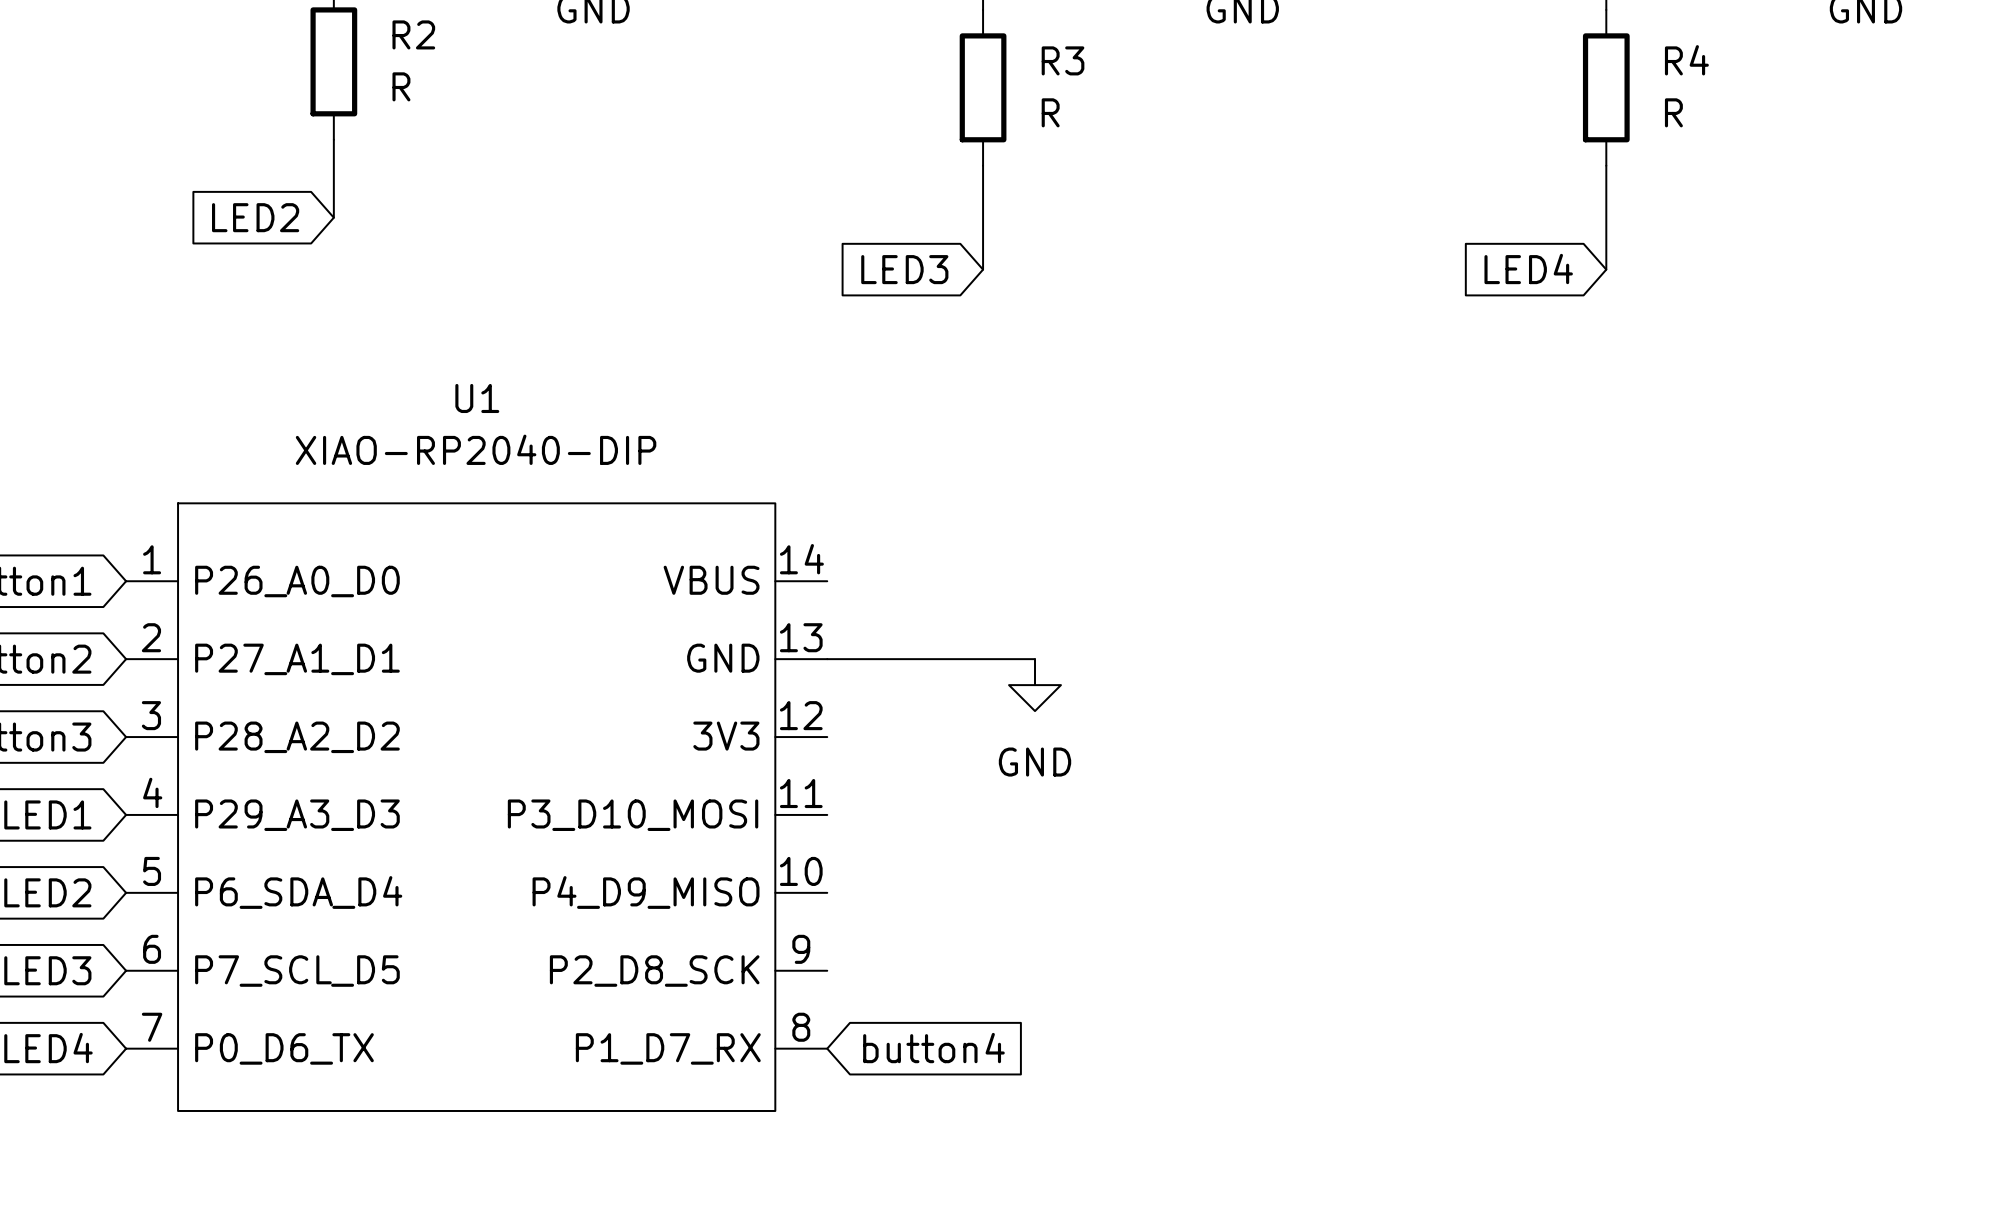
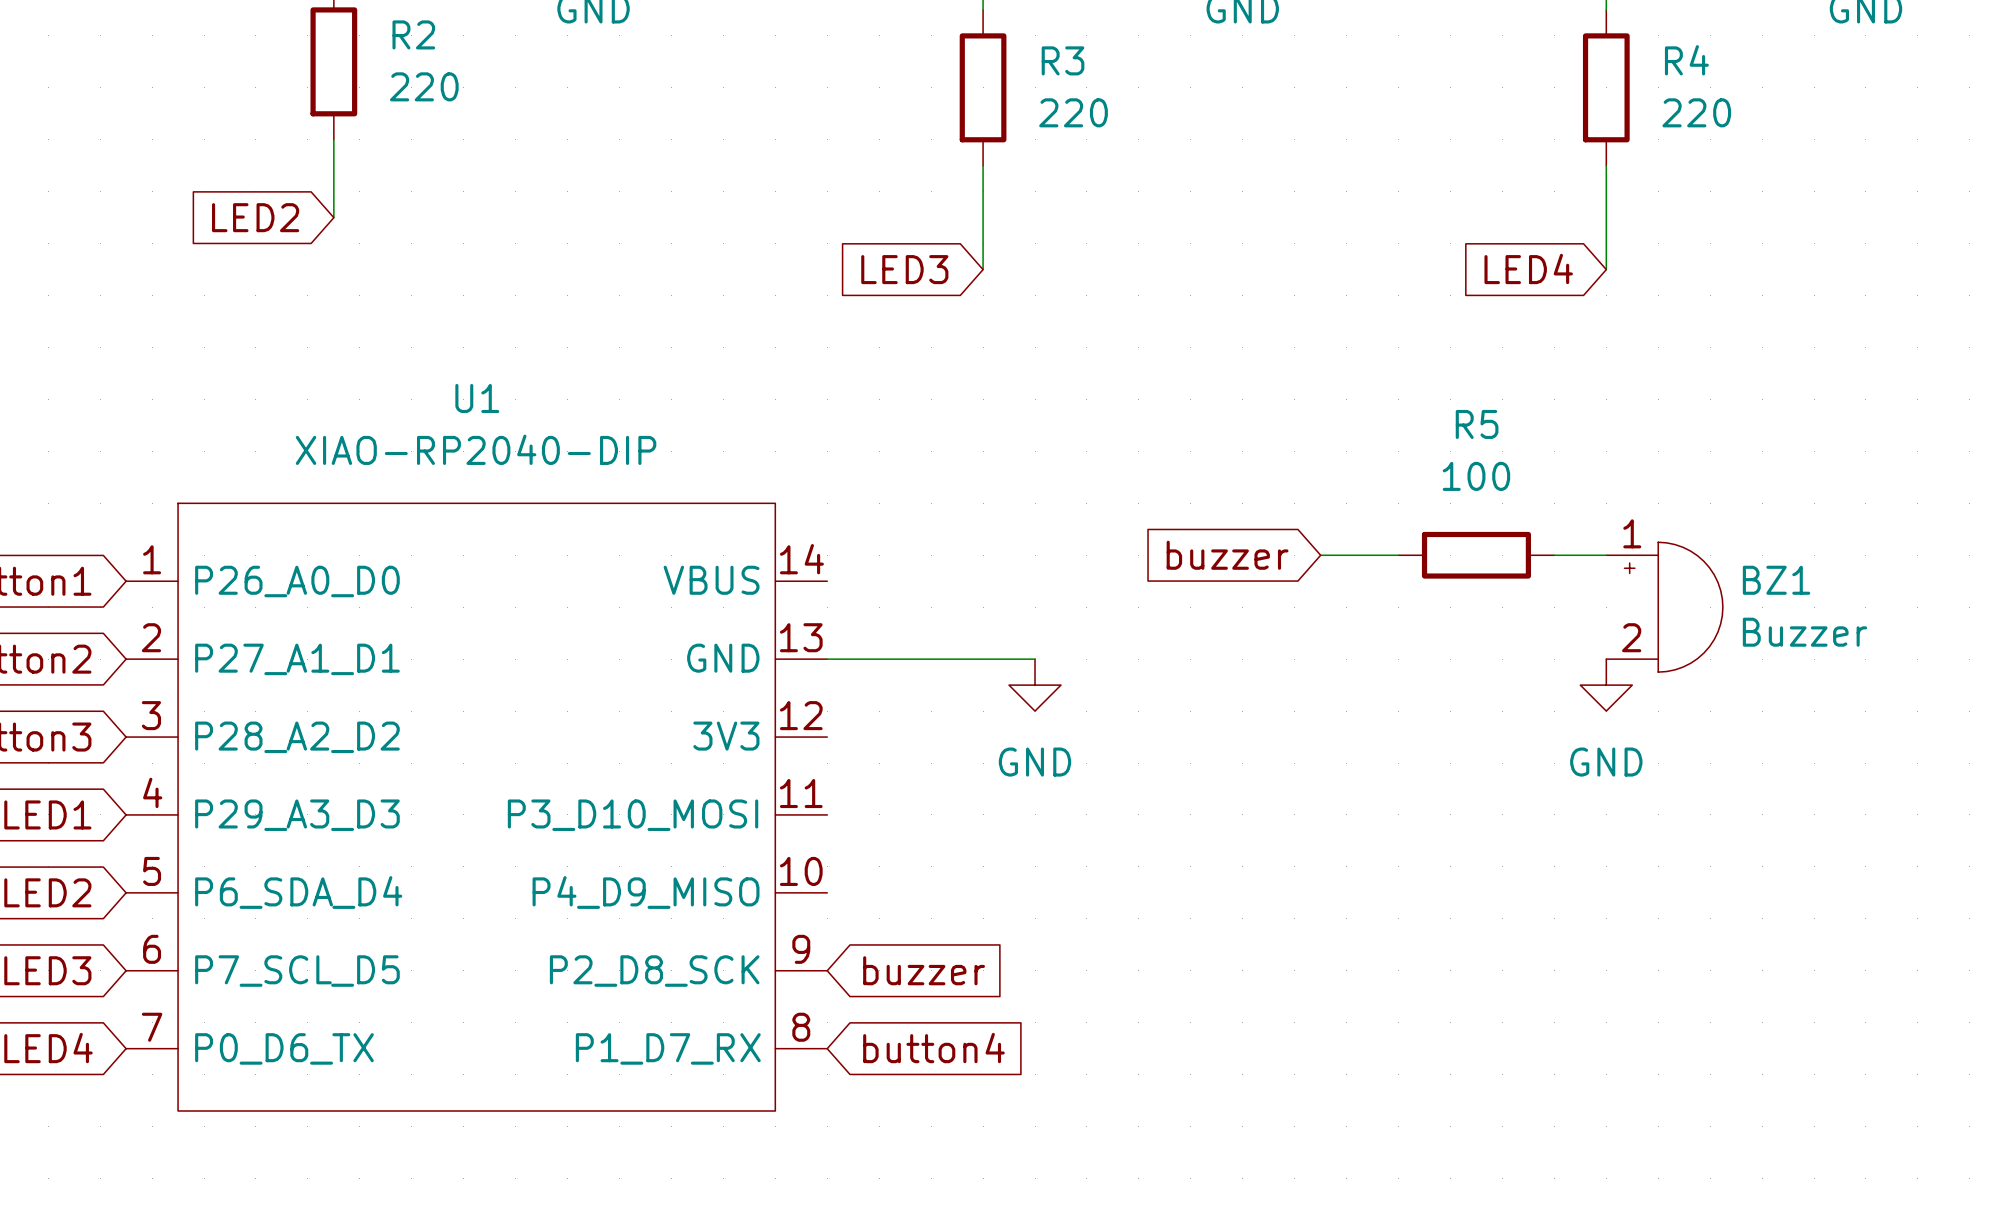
R2 value: R (401, 86) -> 220 (424, 86)
R3 value: R (1050, 112) -> 220 (1073, 112)
R4 value: R (1673, 112) -> 220 (1696, 112)
global label: none -> buzzer (1227, 555)
wire: none -> (1320, 555) (1398, 555)
R5: none -> 100 (1476, 555)
wire: none -> (1554, 555) (1606, 555)
BZ1: none -> Buzzer (1664, 607)
power symbol: none -> GND (1606, 685)
global label: none -> buzzer (924, 970)

